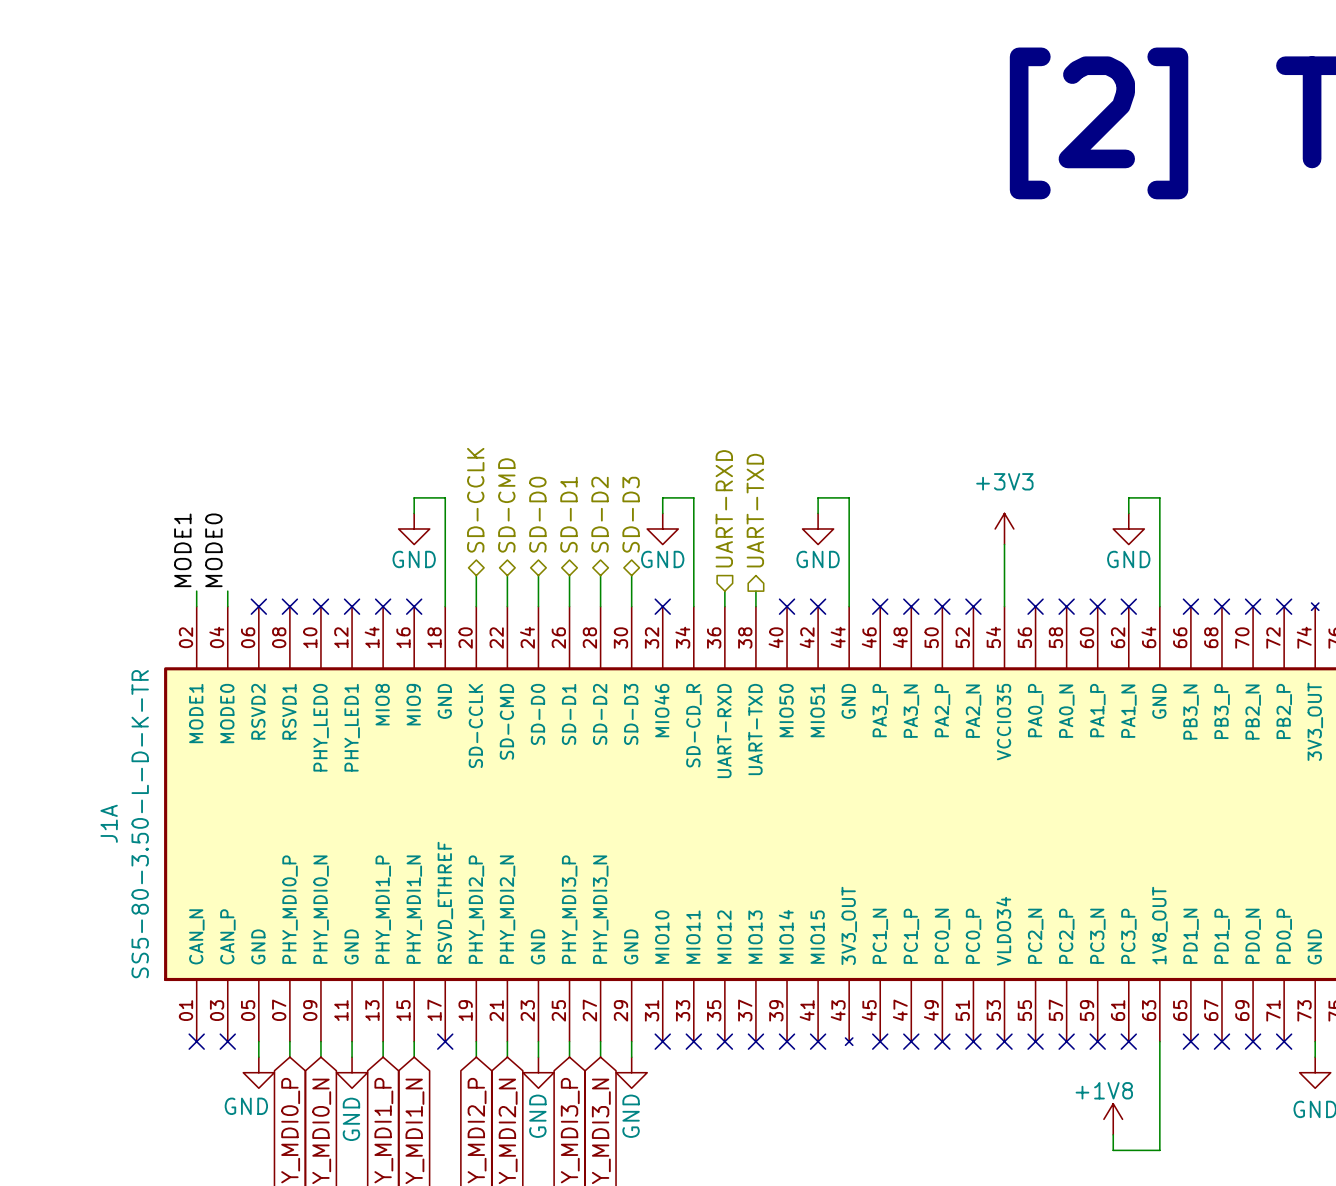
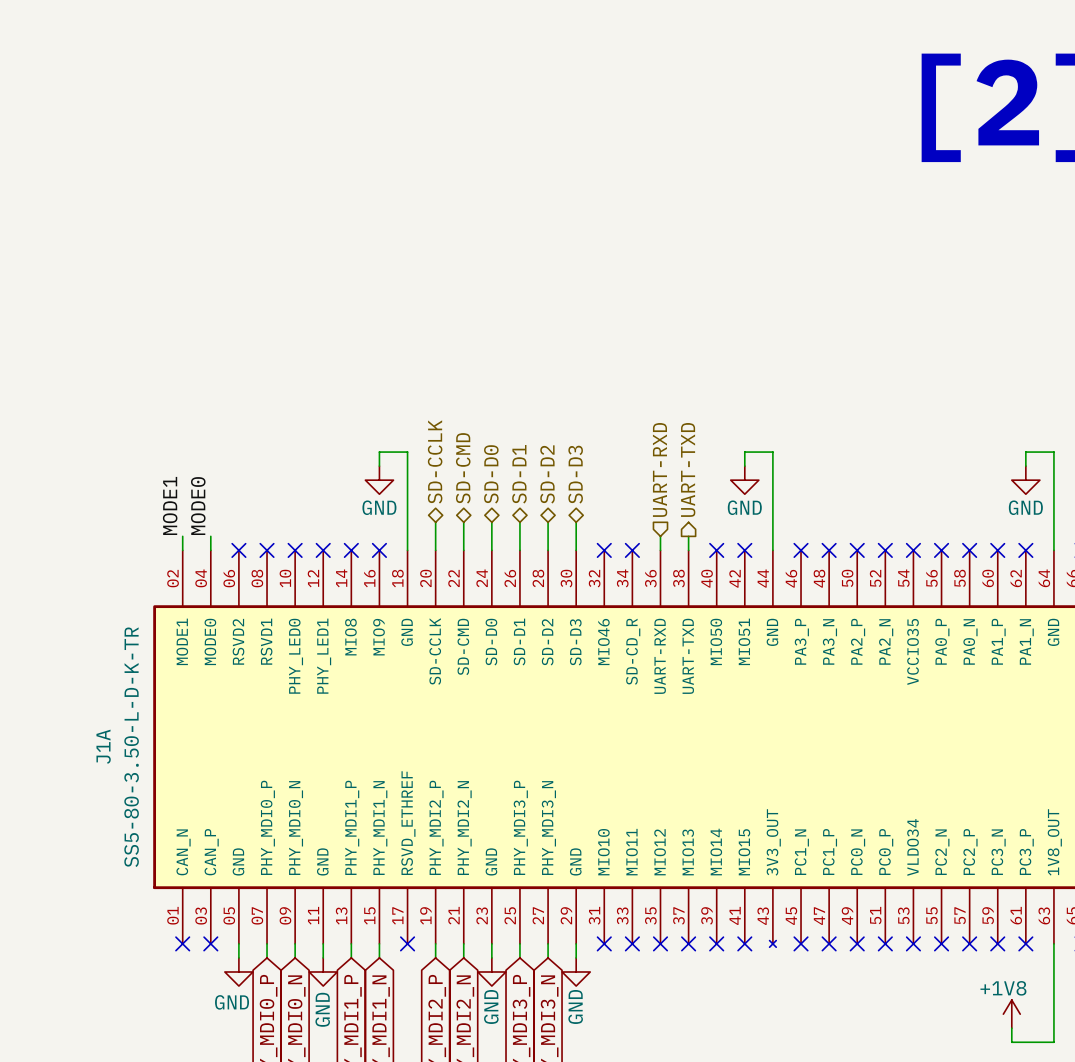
wire: (662, 513) (662, 497) (693, 497) (693, 606) -> none
power symbol: GND (662, 528) -> none
power symbol: +3V3 (1004, 528) -> none
wire: (1004, 544) (1004, 606) -> none
no-connect mark: none -> (632, 550)
no-connect mark: none -> (913, 550)

